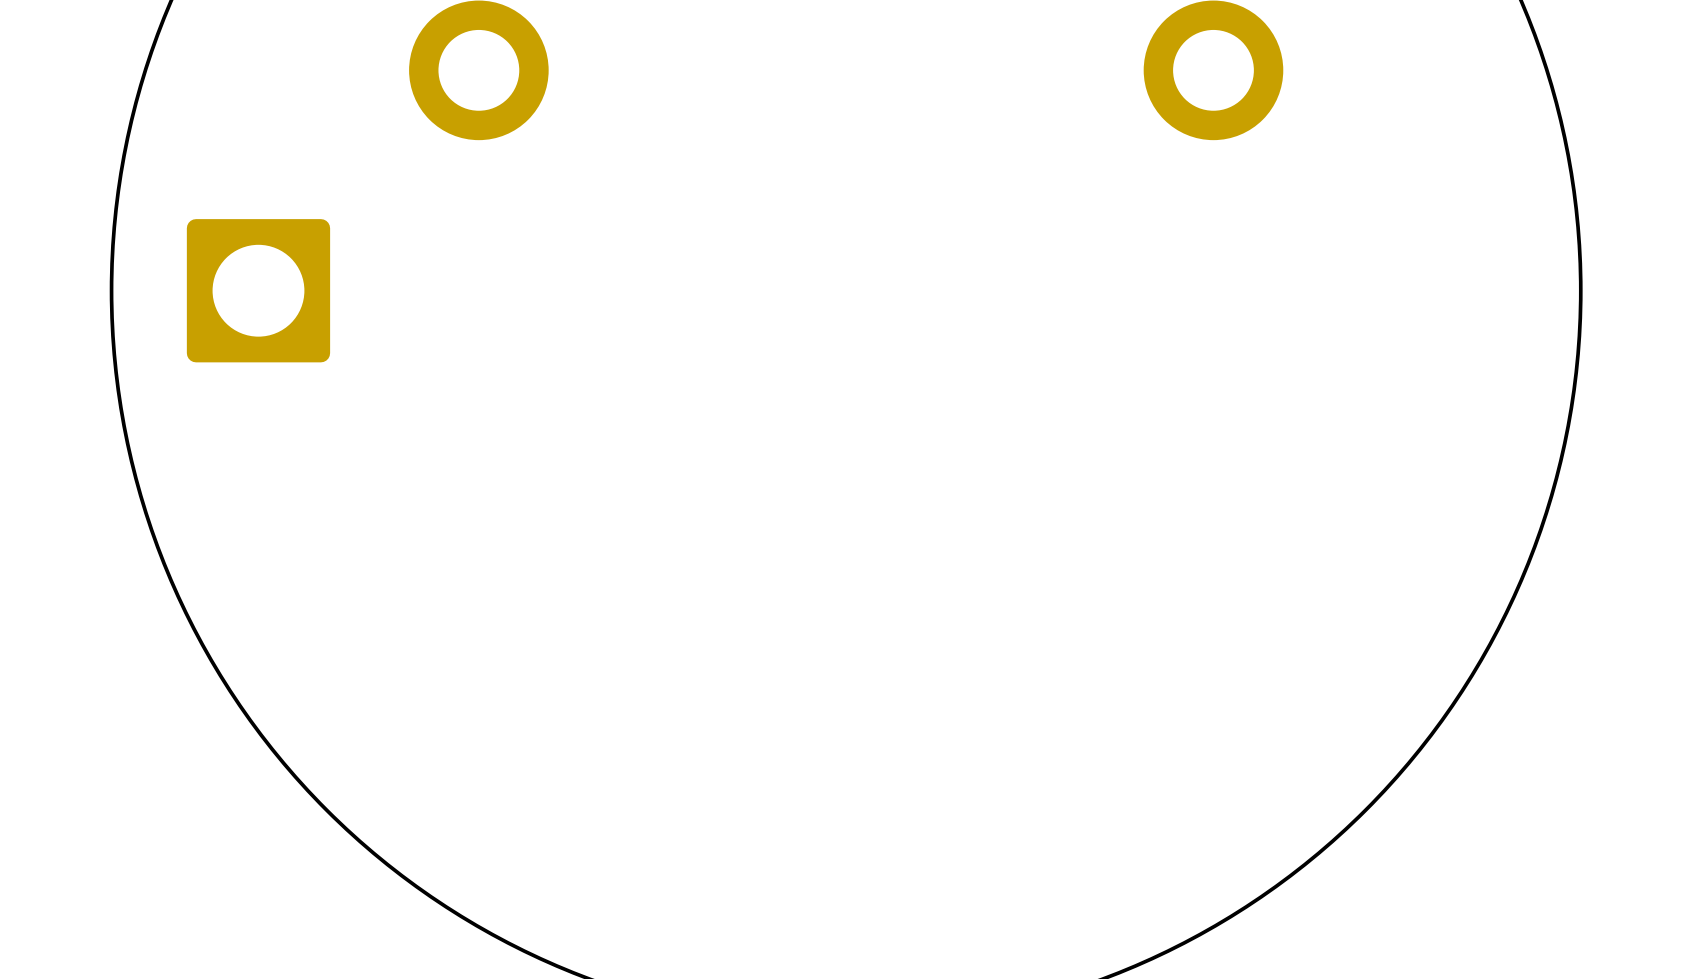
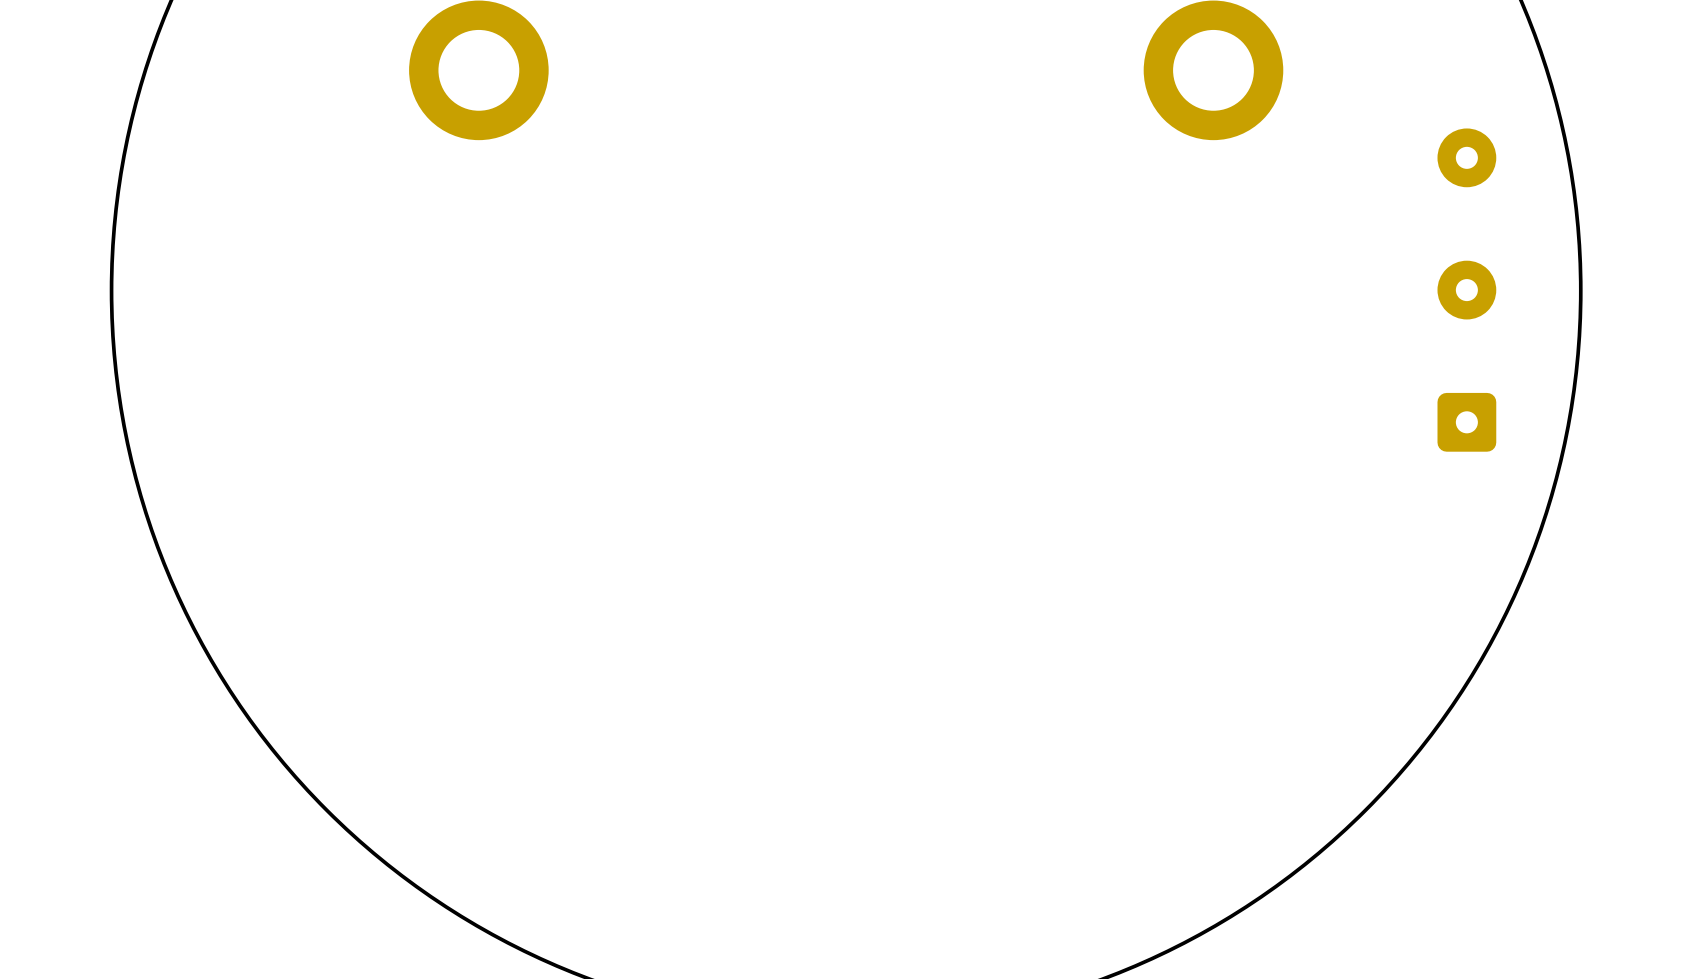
part: (258, 290) -> none
part: none -> (1466, 290)

